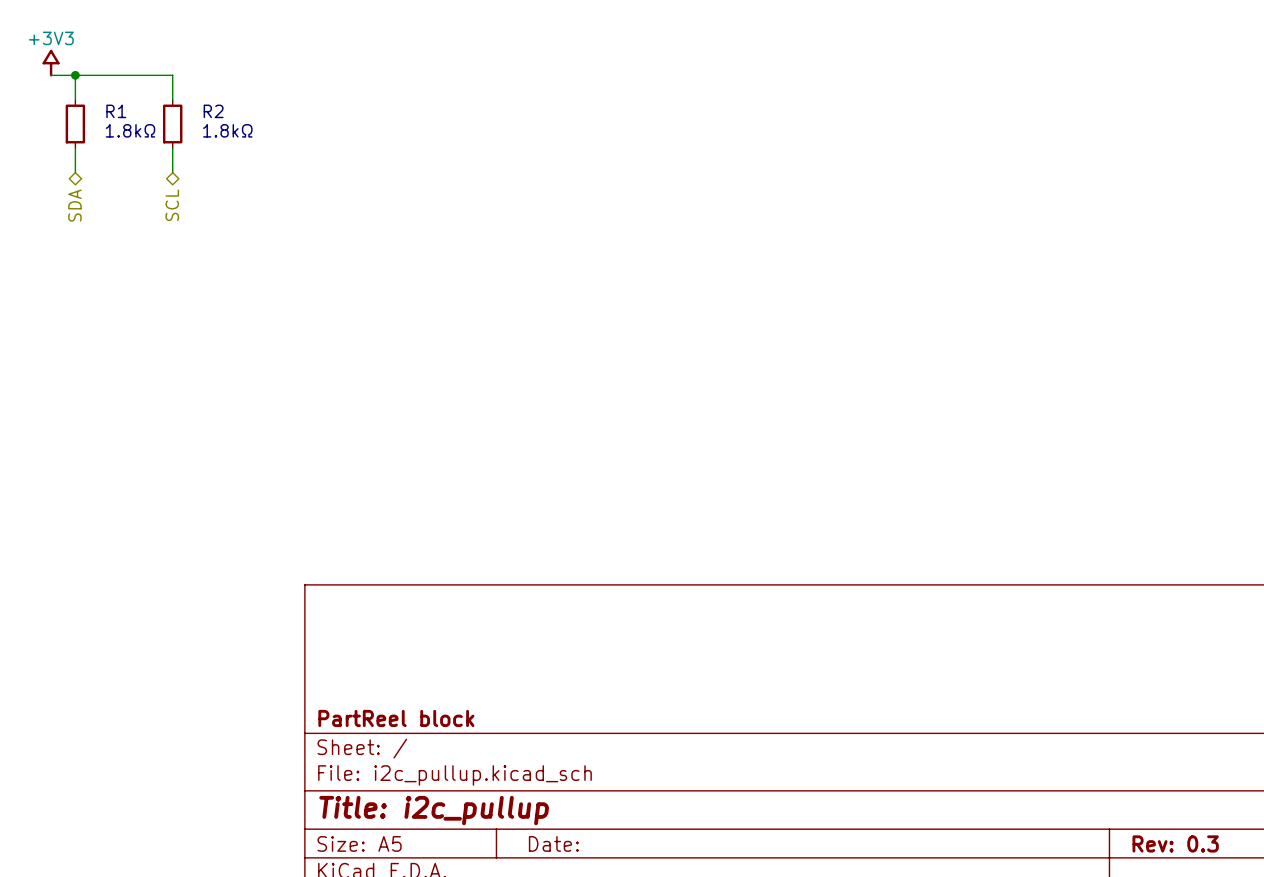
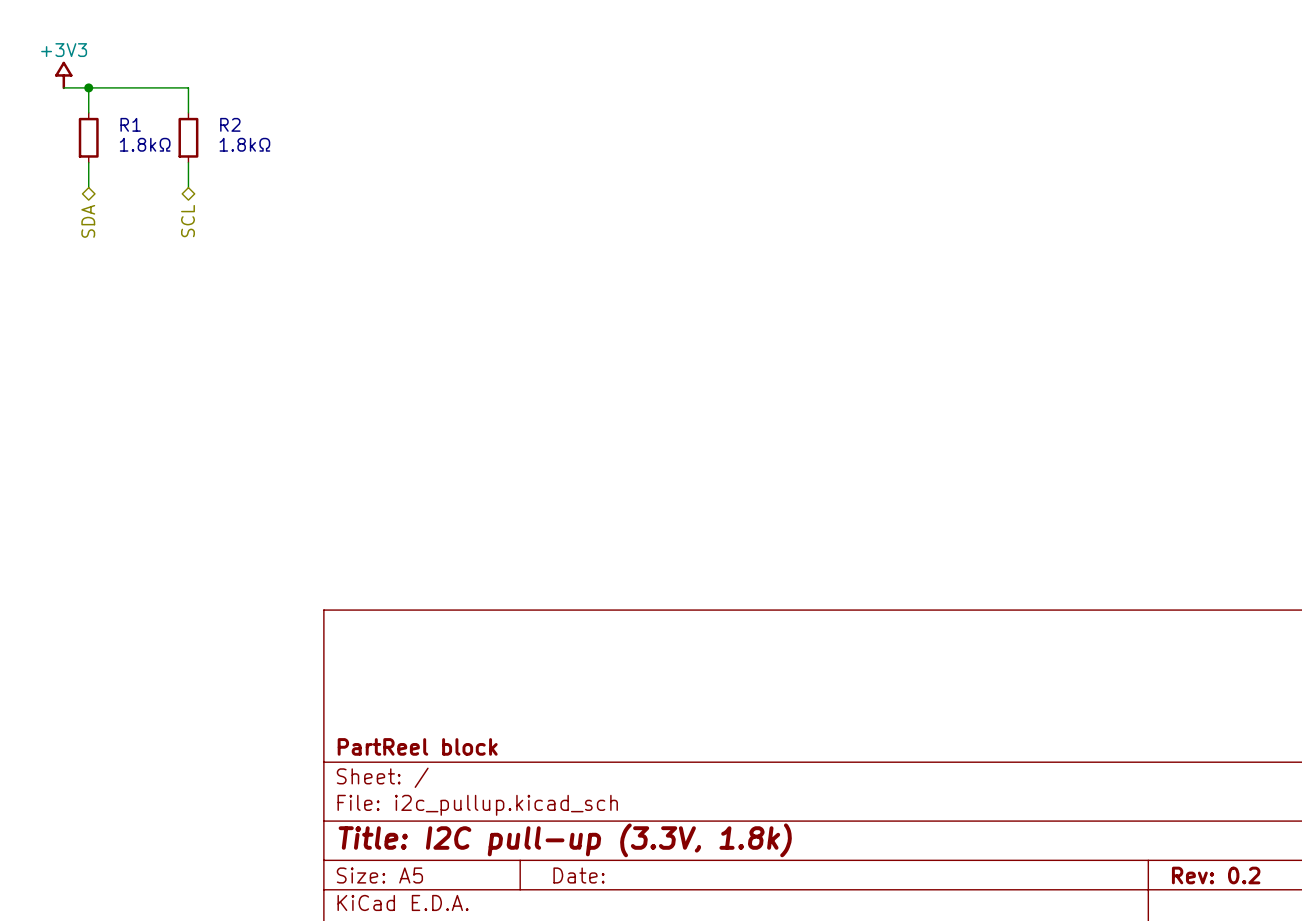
title block: Title: i2c_pullup (434, 810) -> Title: I2C pull-up (3.3V, 1.8k) (565, 840)
title block: Rev: 0.3 (1175, 843) -> Rev: 0.2 (1216, 875)

